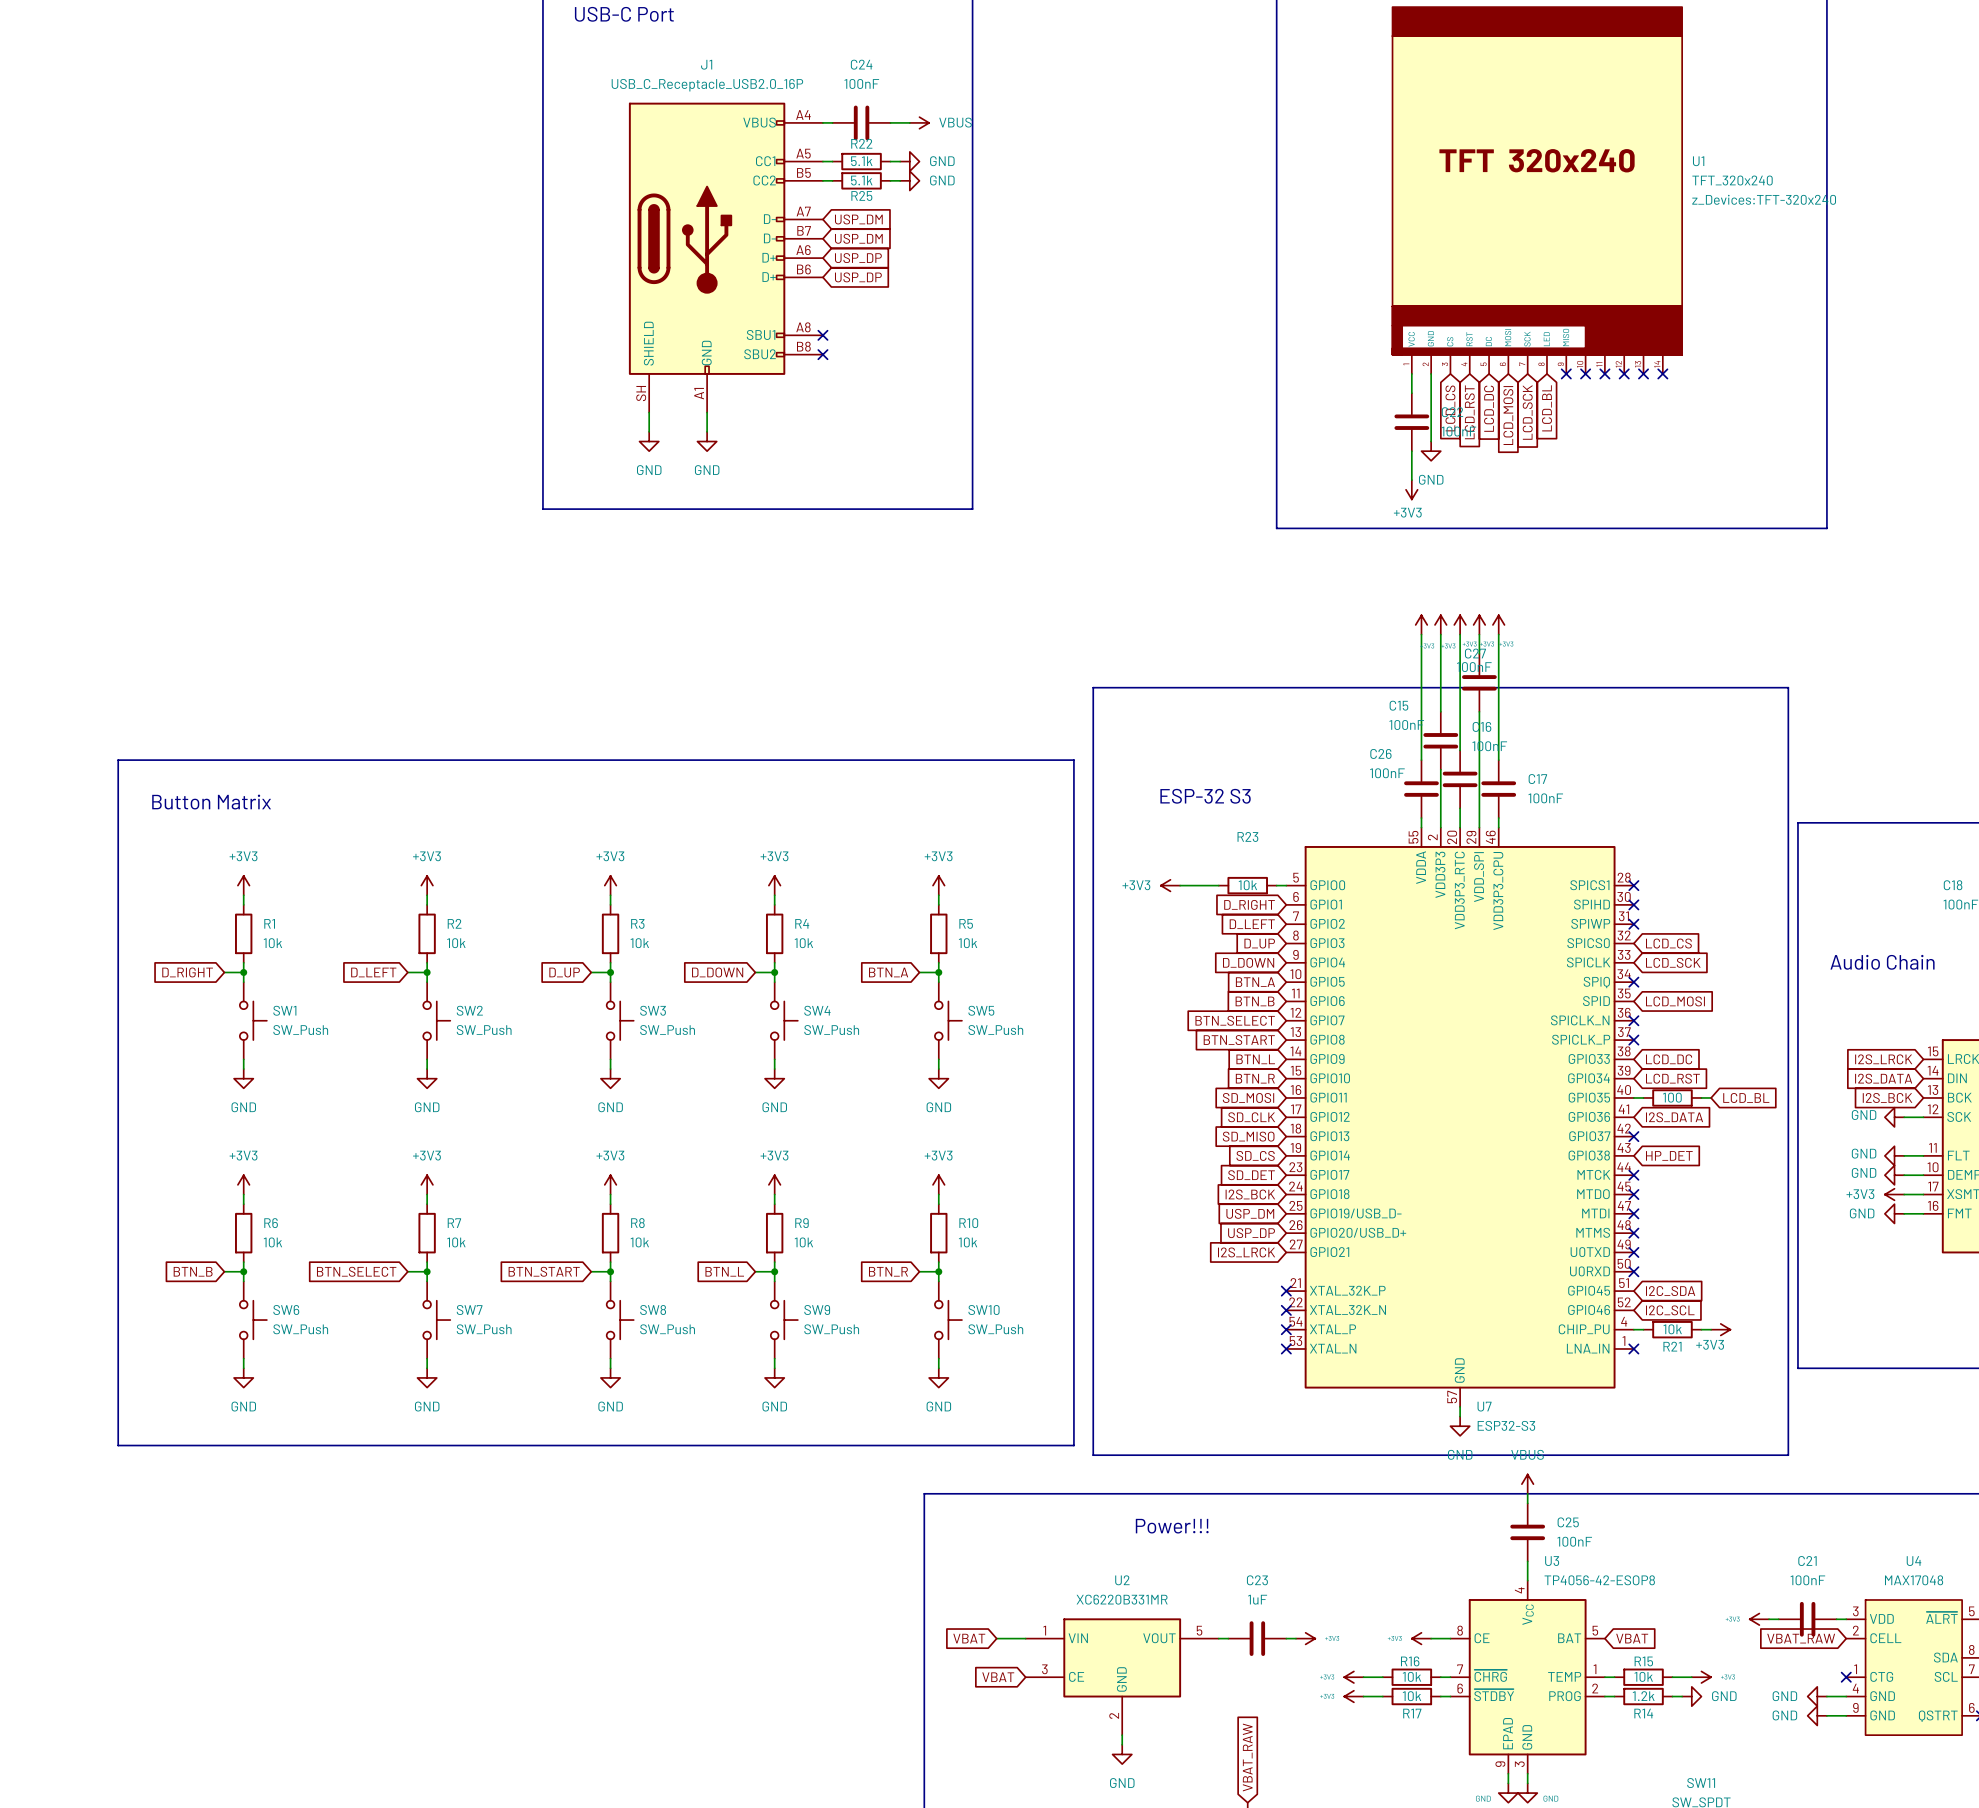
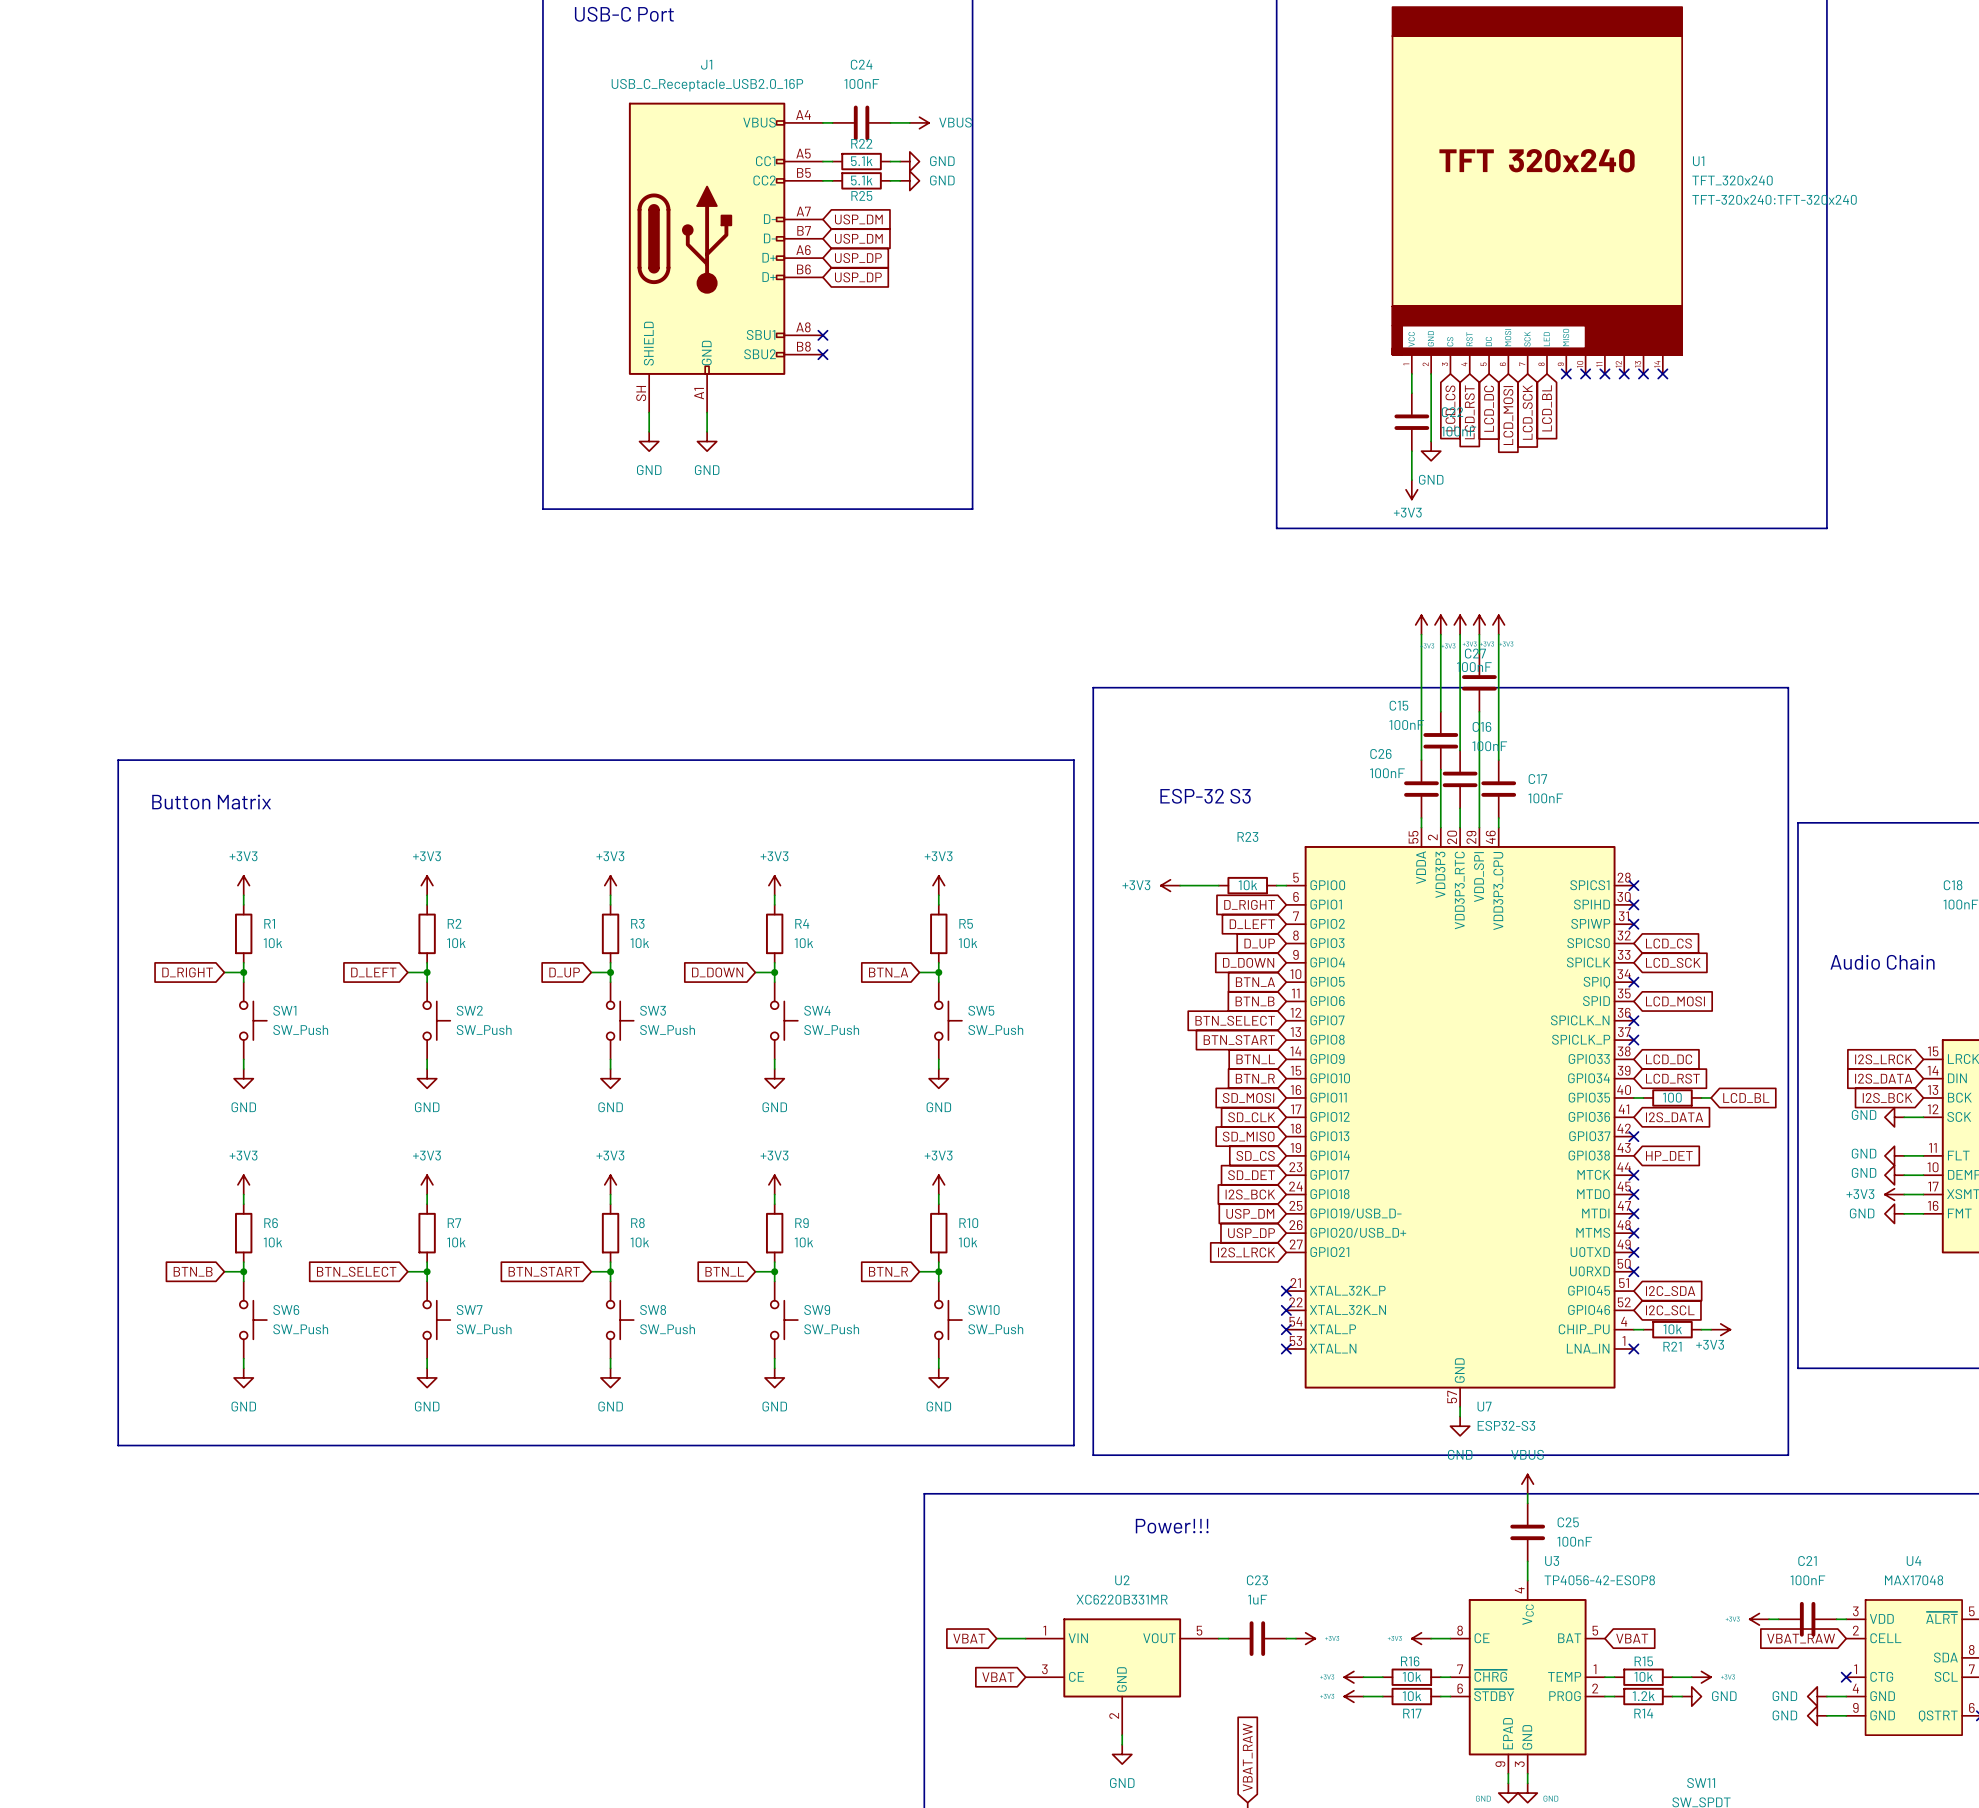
U1 text: z_Devices:TFT-320x240 (1764, 199) -> TFT-320x240:TFT-320x240 (1774, 199)

